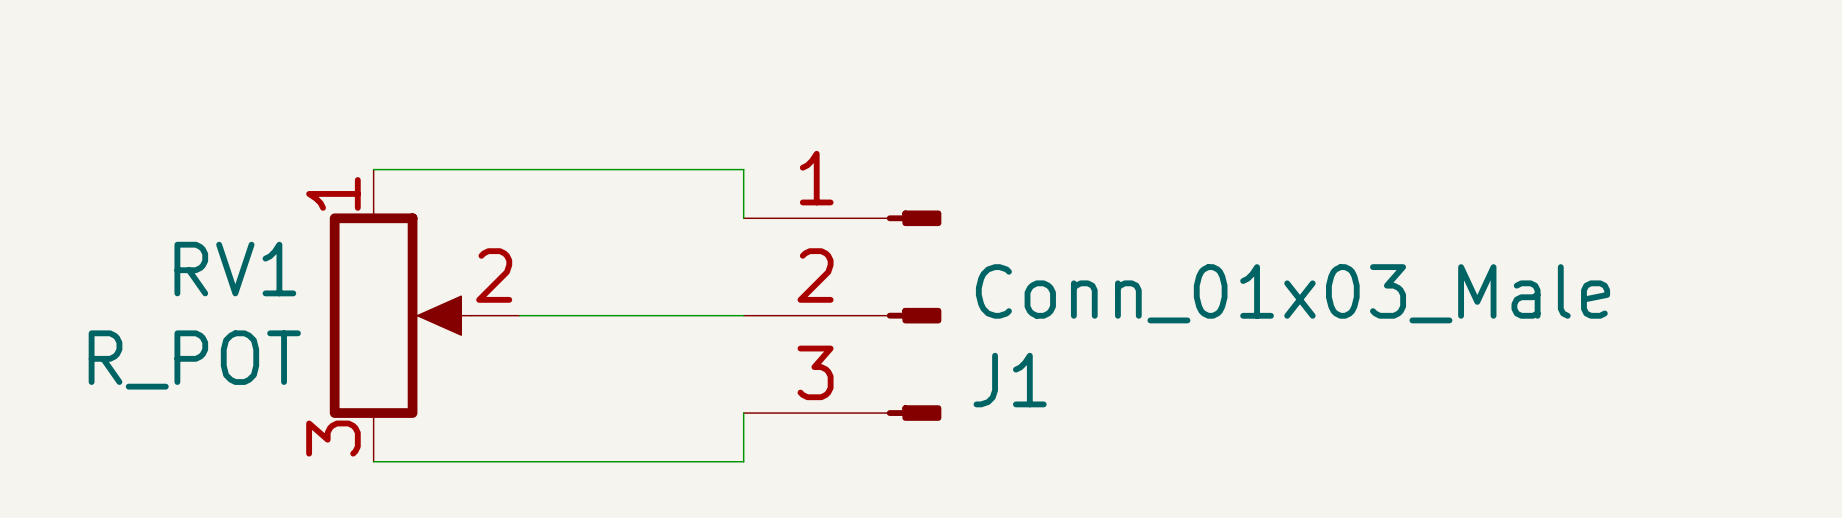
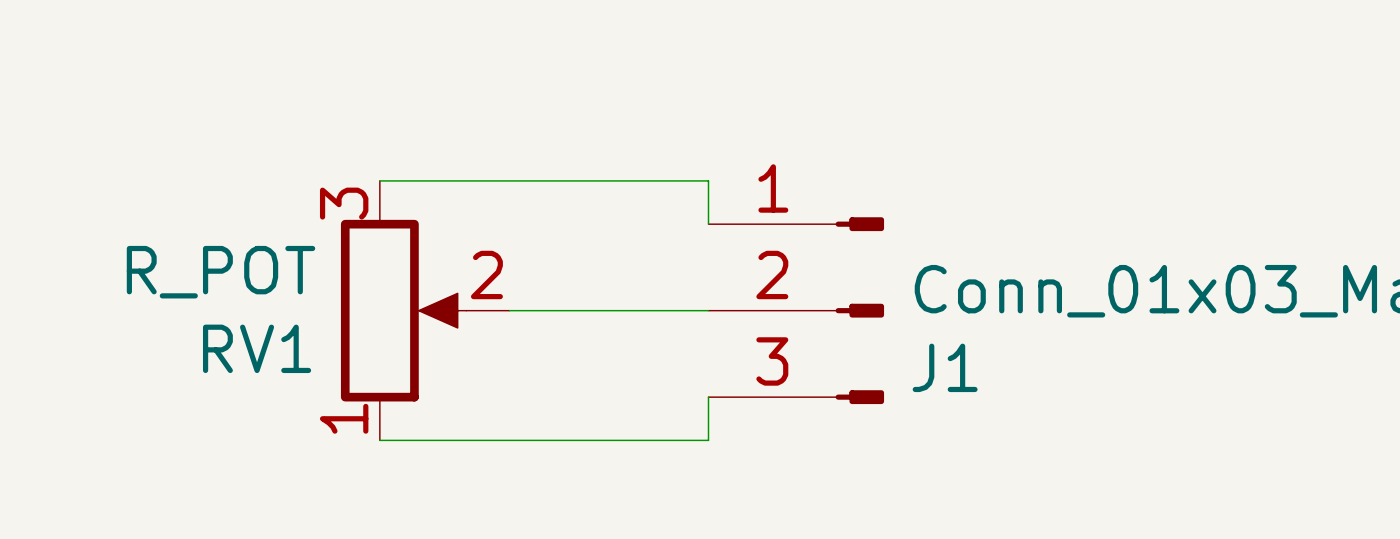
RV1 flip: as is (400, 315) -> up-down (403, 310)

